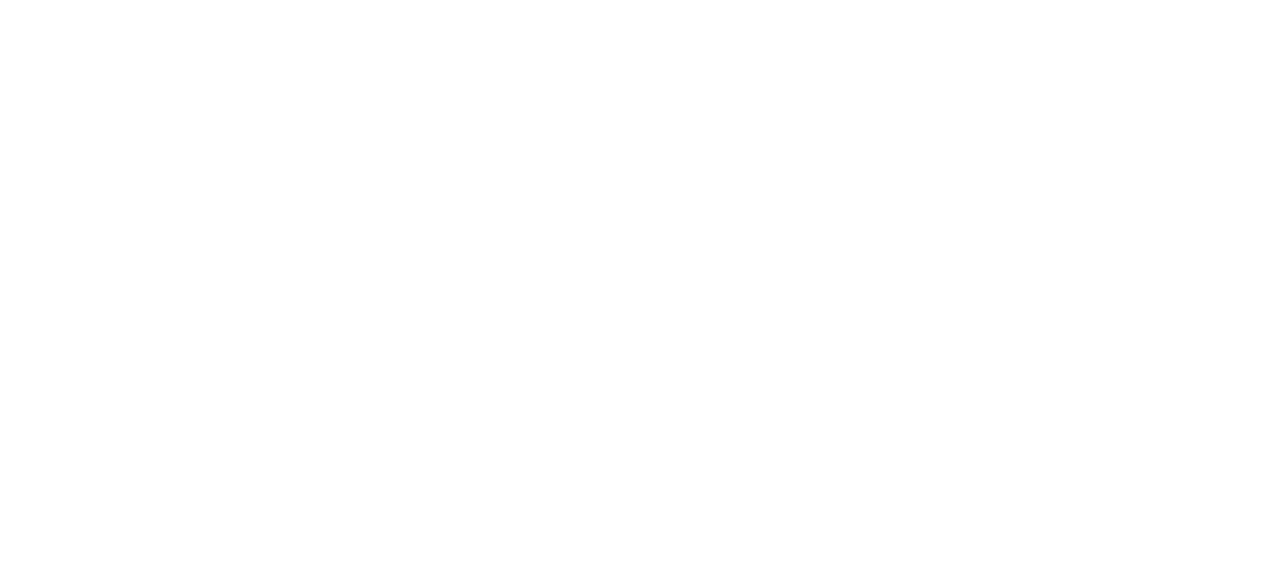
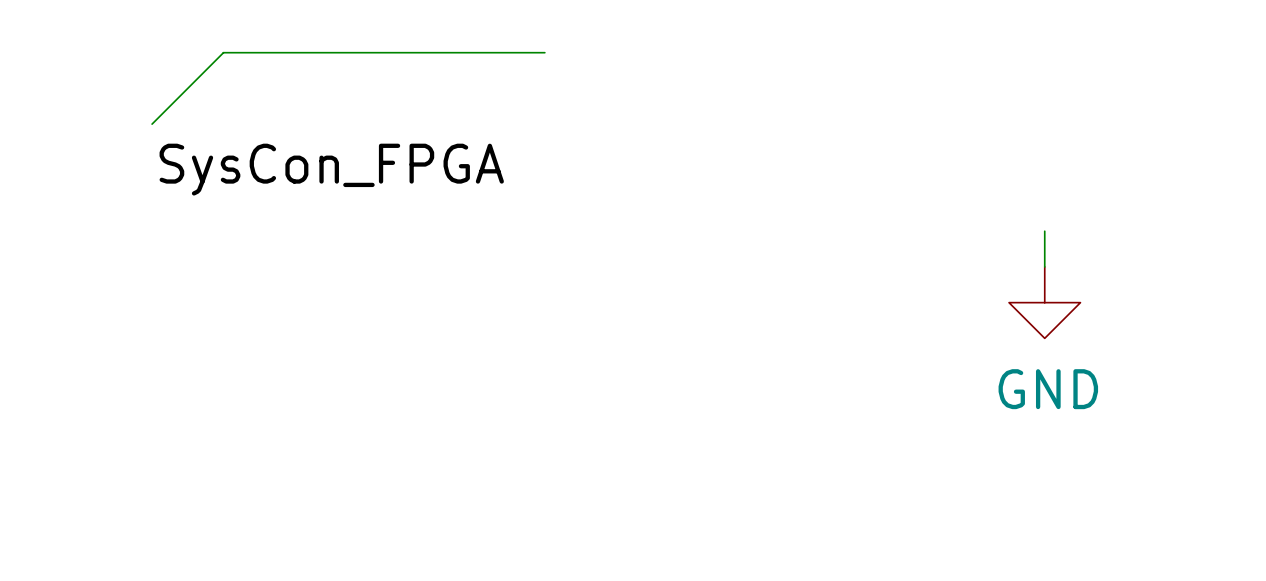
wire: none -> (544, 52) (223, 52) (152, 124)
label: none -> SysCon_FPGA (331, 169)
wire: none -> (1044, 231) (1044, 266)
power symbol: none -> GND (1044, 302)

